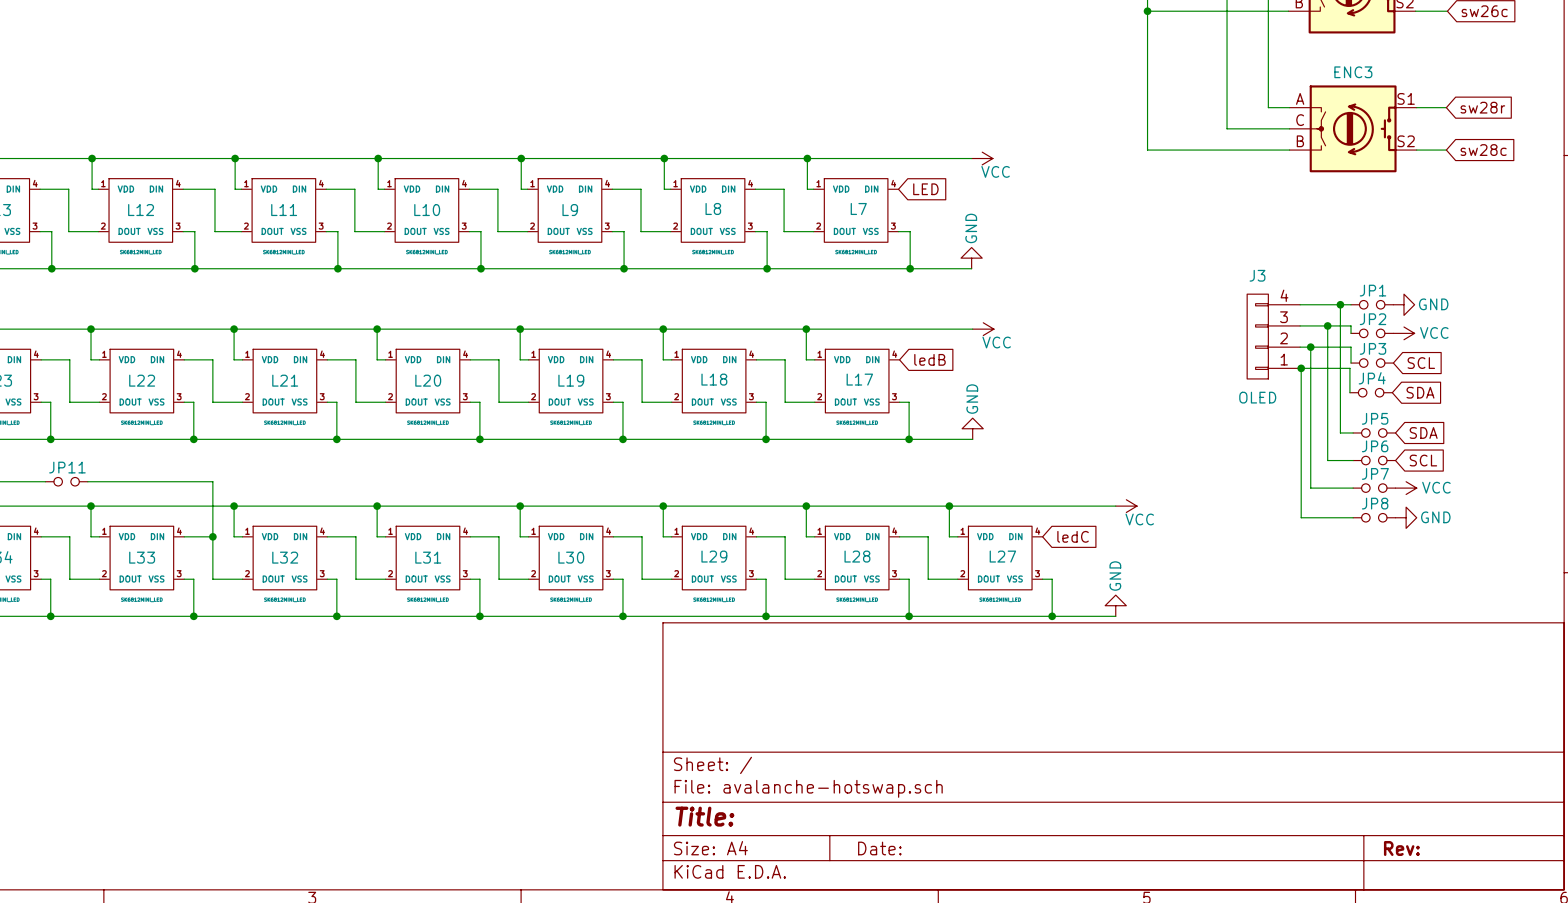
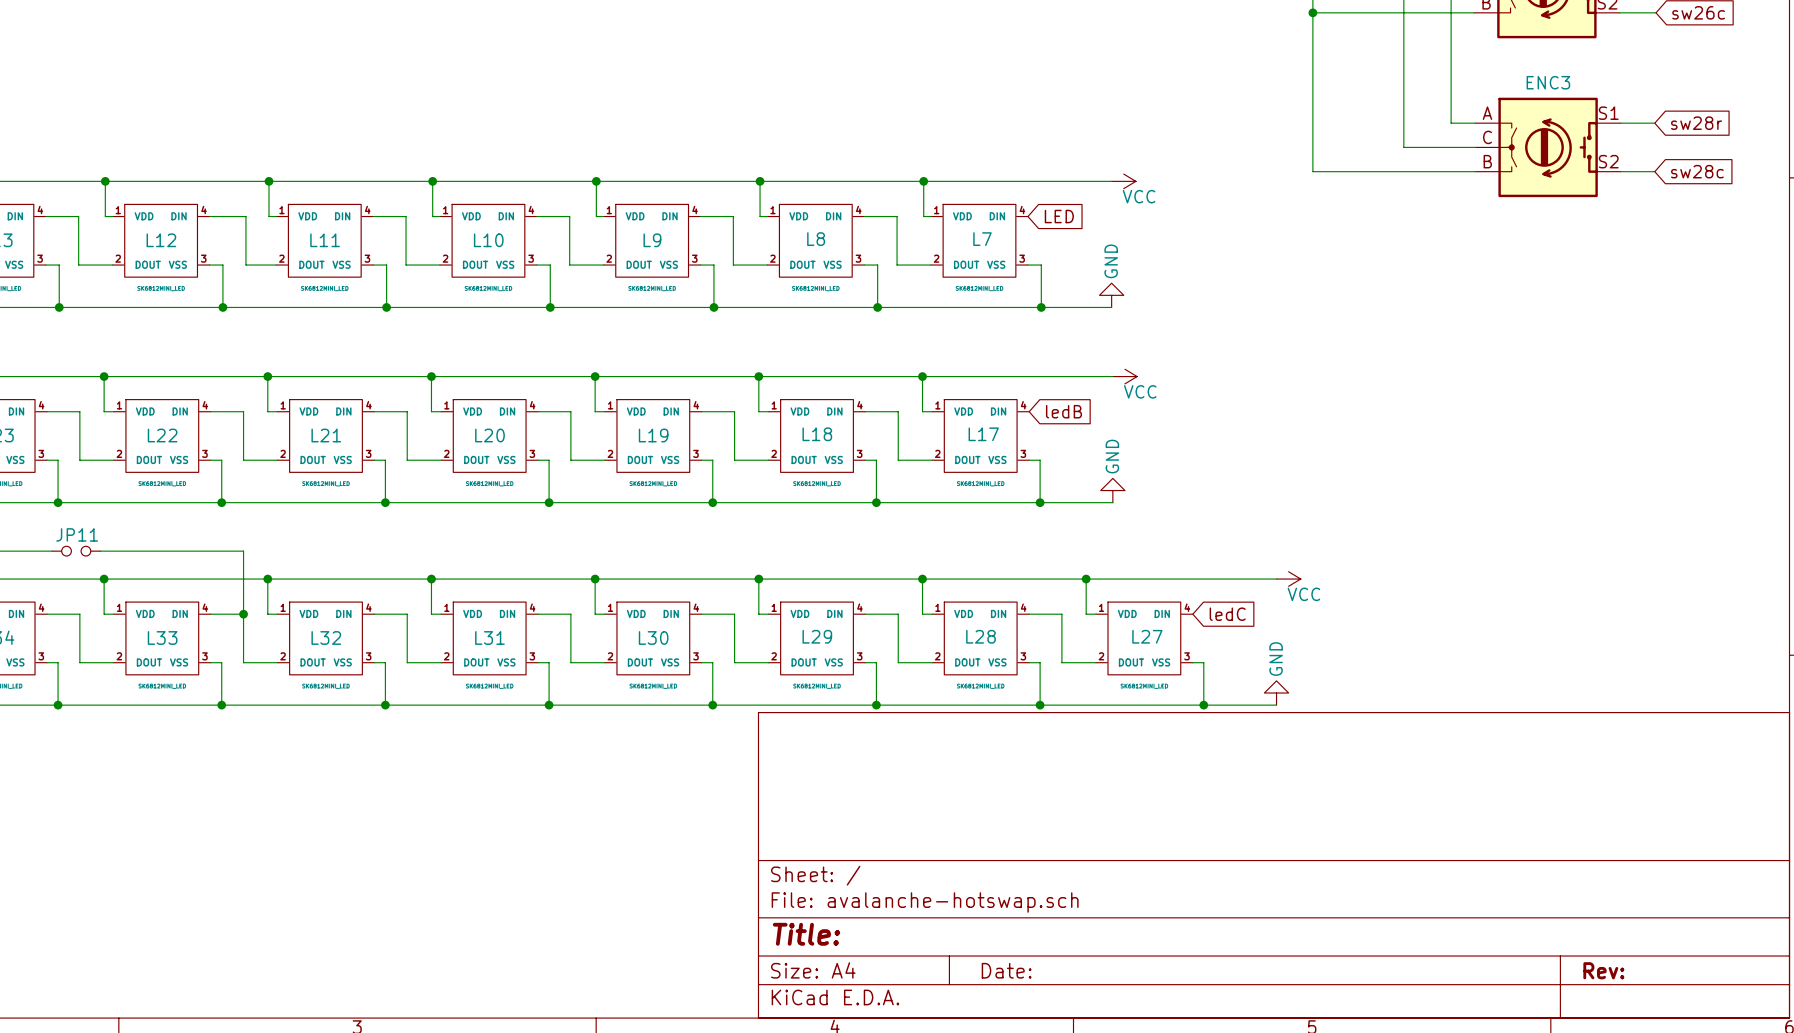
wire: (1300, 304) (1351, 304) -> none
wire: (1340, 304) (1340, 432) (1353, 432) -> none
junction: (1340, 304) -> none
JP1: (1372, 304) -> none
power symbol: GND (1403, 304) -> none
wire: (1300, 325) (1351, 325) (1351, 333) -> none
wire: (1327, 325) (1327, 460) (1353, 460) -> none
junction: (1327, 325) -> none
JP2: (1372, 333) -> none
power symbol: VCC (1403, 333) -> none
J3: OLED (1273, 336) -> none
wire: (1300, 347) (1351, 347) (1351, 363) -> none
wire: (1310, 347) (1310, 488) (1353, 488) -> none
junction: (1310, 347) -> none
JP3: (1372, 363) -> none
global label: SCL (1421, 363) -> none
wire: (1300, 368) (1349, 368) (1349, 392) -> none
wire: (1301, 368) (1301, 517) (1353, 517) -> none
junction: (1301, 368) -> none
JP4: (1371, 392) -> none
global label: SDA (1420, 392) -> none
JP5: (1374, 432) -> none
global label: SDA (1423, 432) -> none
JP6: (1374, 460) -> none
global label: SCL (1423, 460) -> none
JP7: (1374, 488) -> none
power symbol: VCC (1406, 488) -> none
JP8: (1374, 517) -> none
power symbol: GND (1406, 517) -> none

